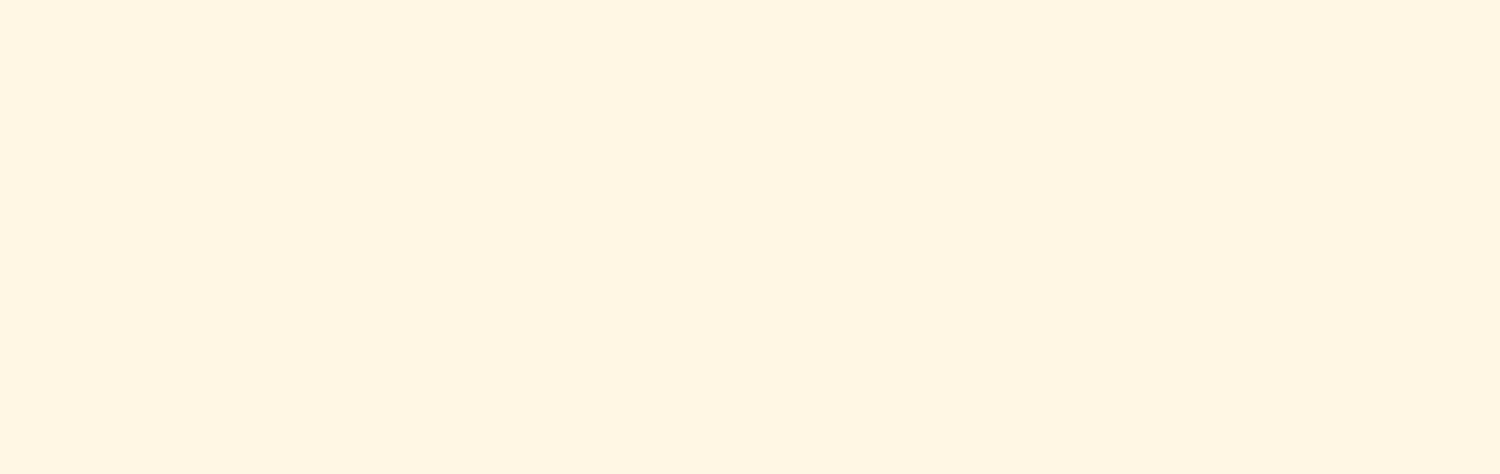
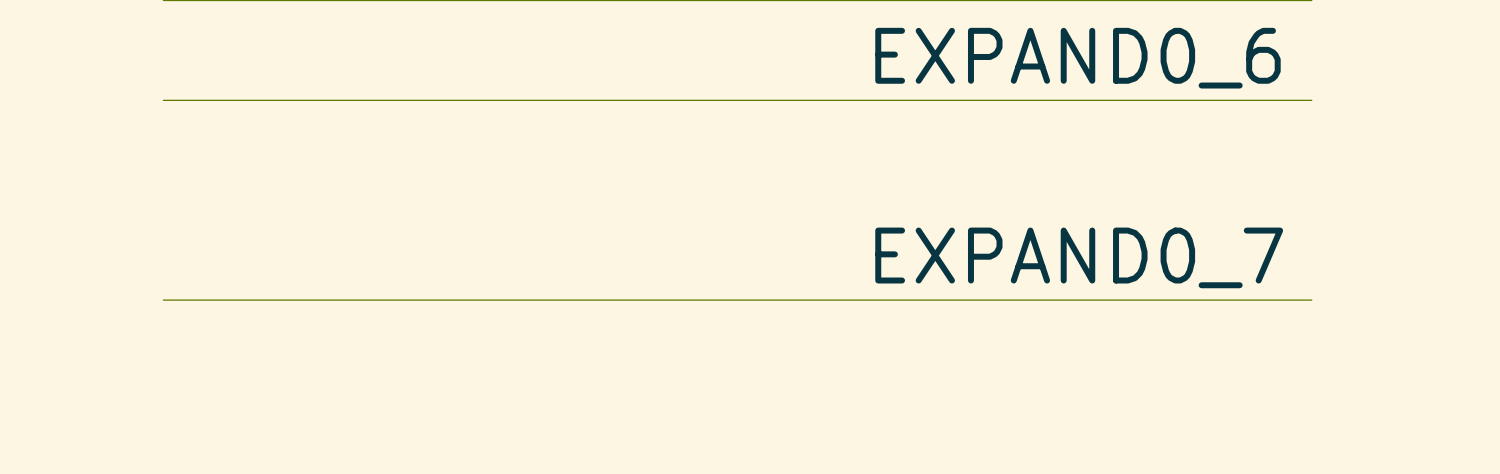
wire: none -> (163, 0) (1311, 0)
label: none -> EXPAND0_6 (1077, 58)
wire: none -> (163, 100) (1311, 100)
label: none -> EXPAND0_7 (1079, 257)
wire: none -> (163, 300) (1311, 300)

